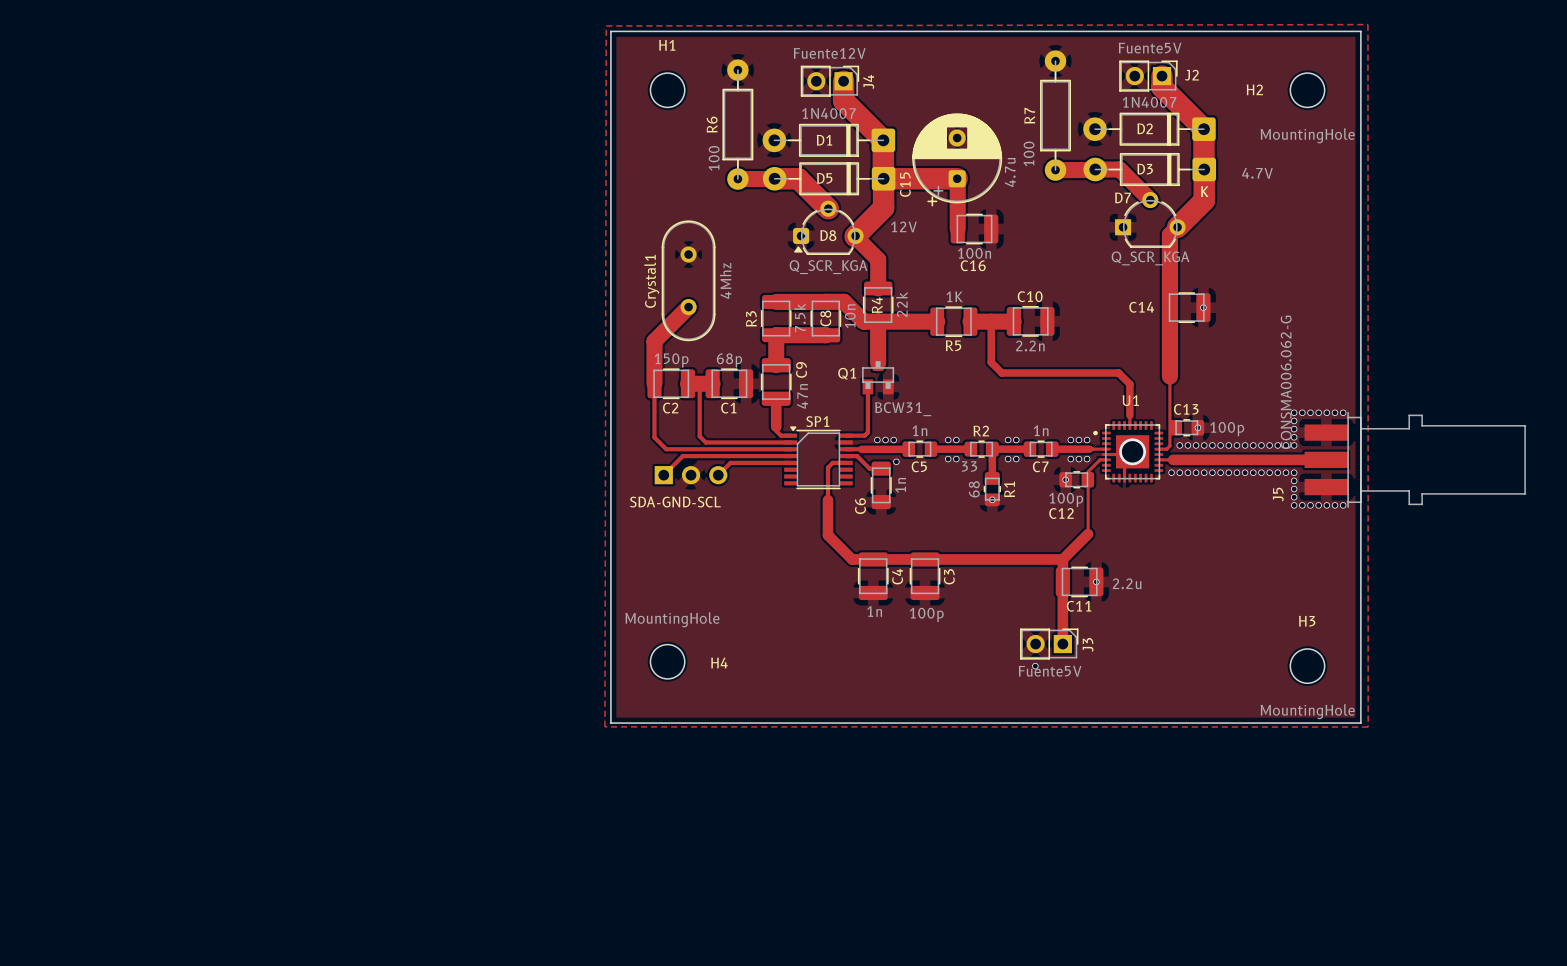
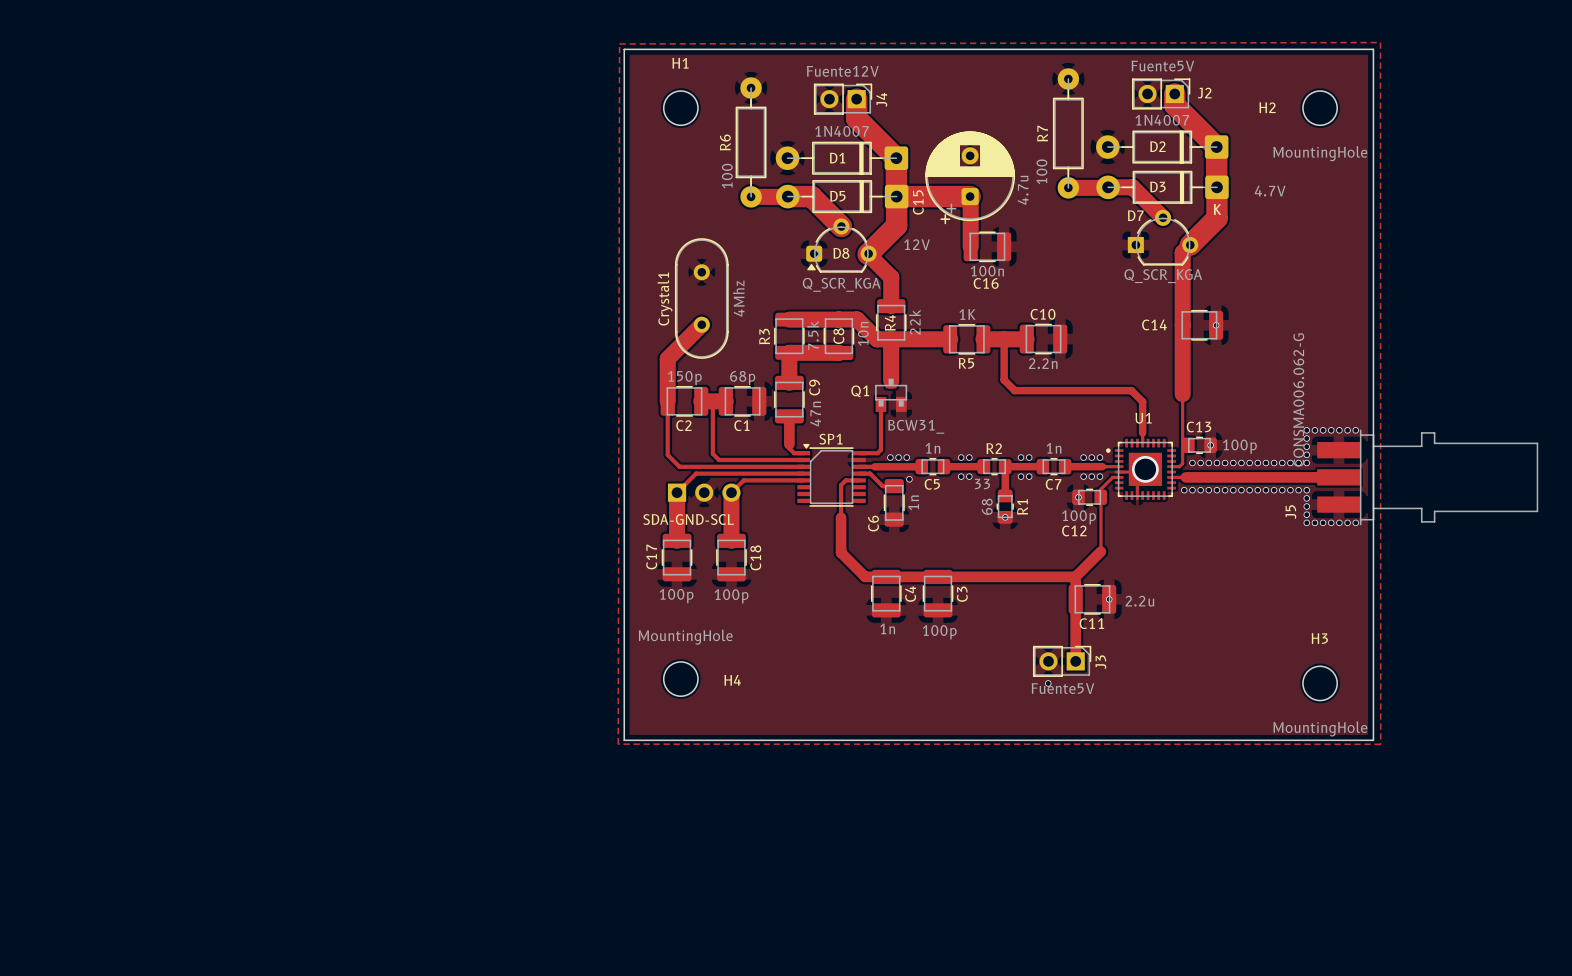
track: none -> (677, 492) (677, 540)
track: none -> (731, 492) (731, 540)
C17: none -> 100p (677, 557)
C18: none -> 100p (731, 557)

